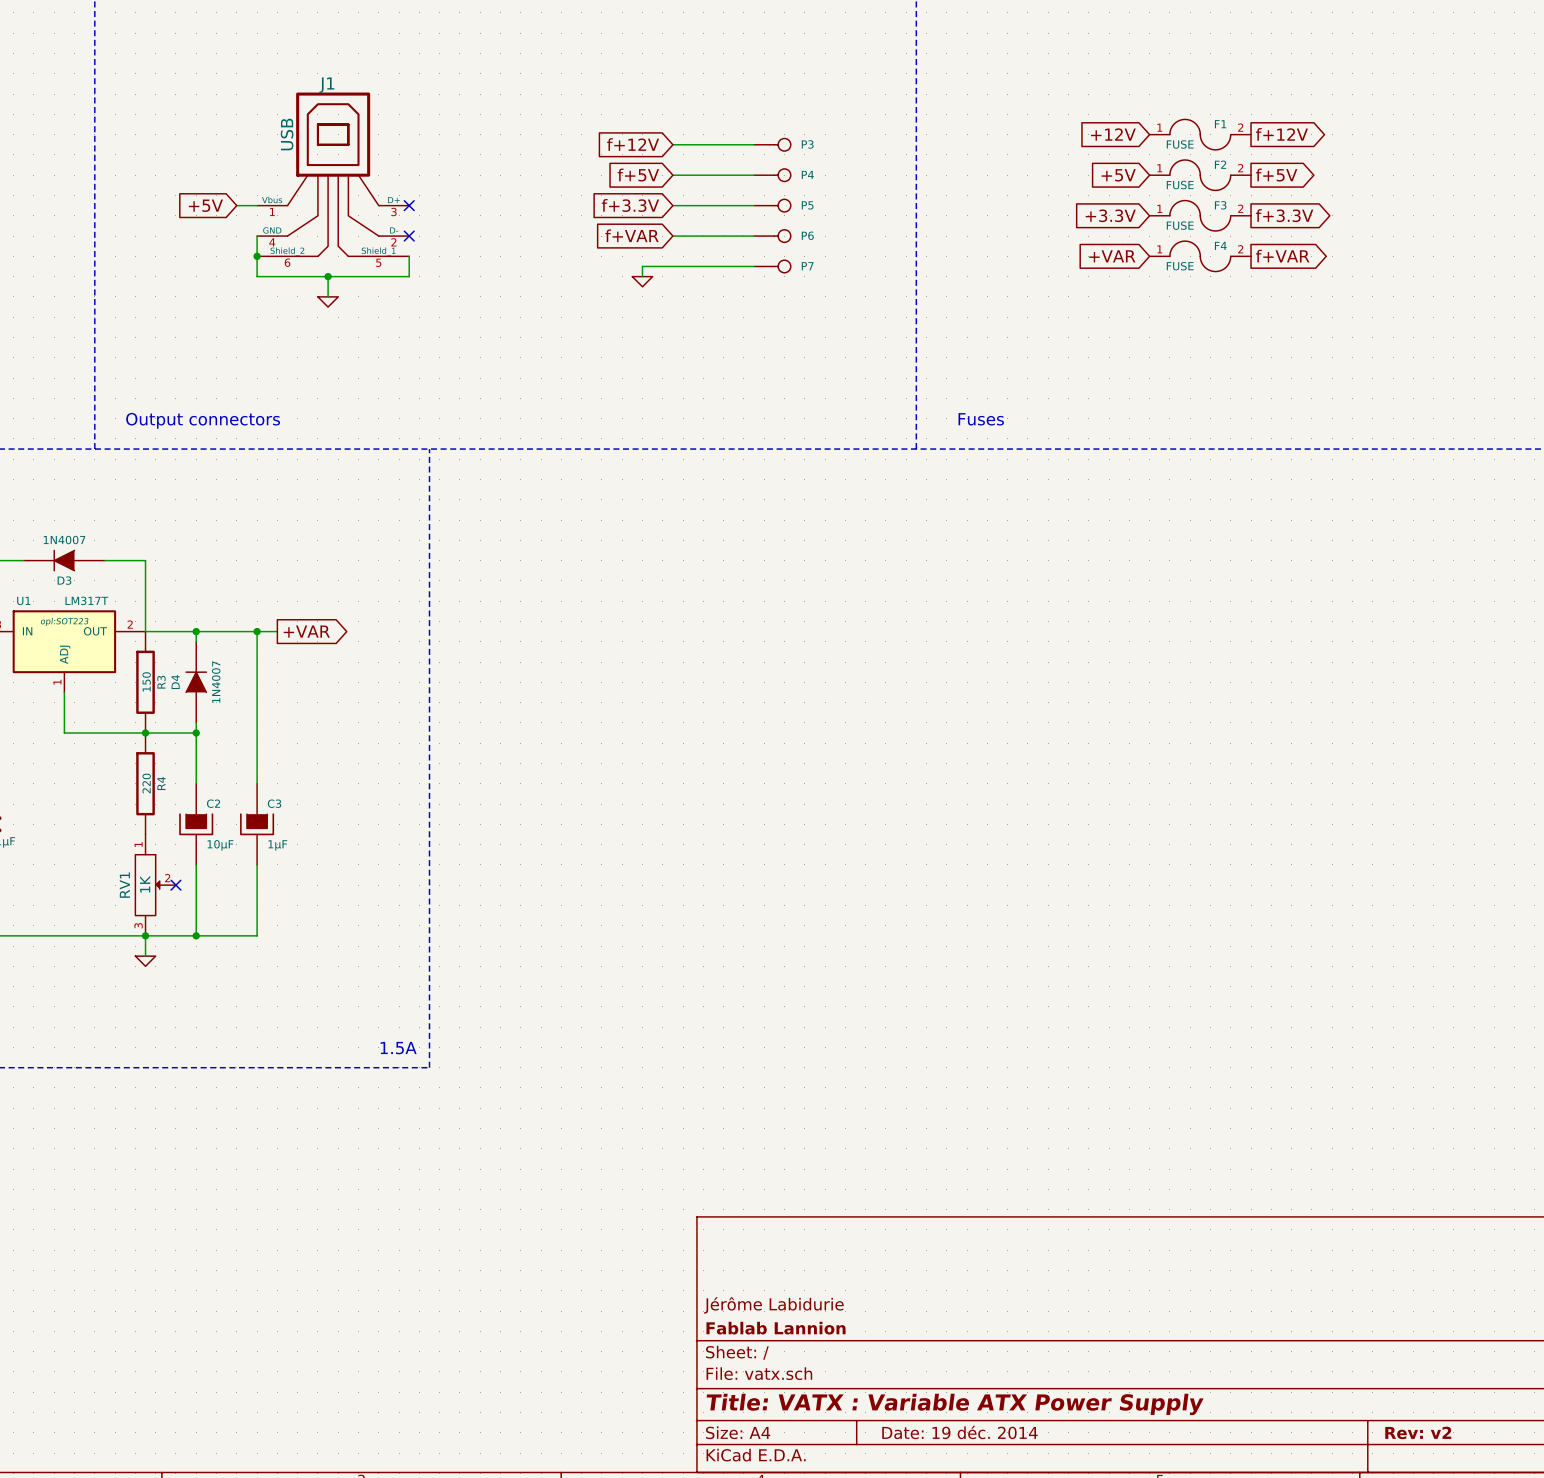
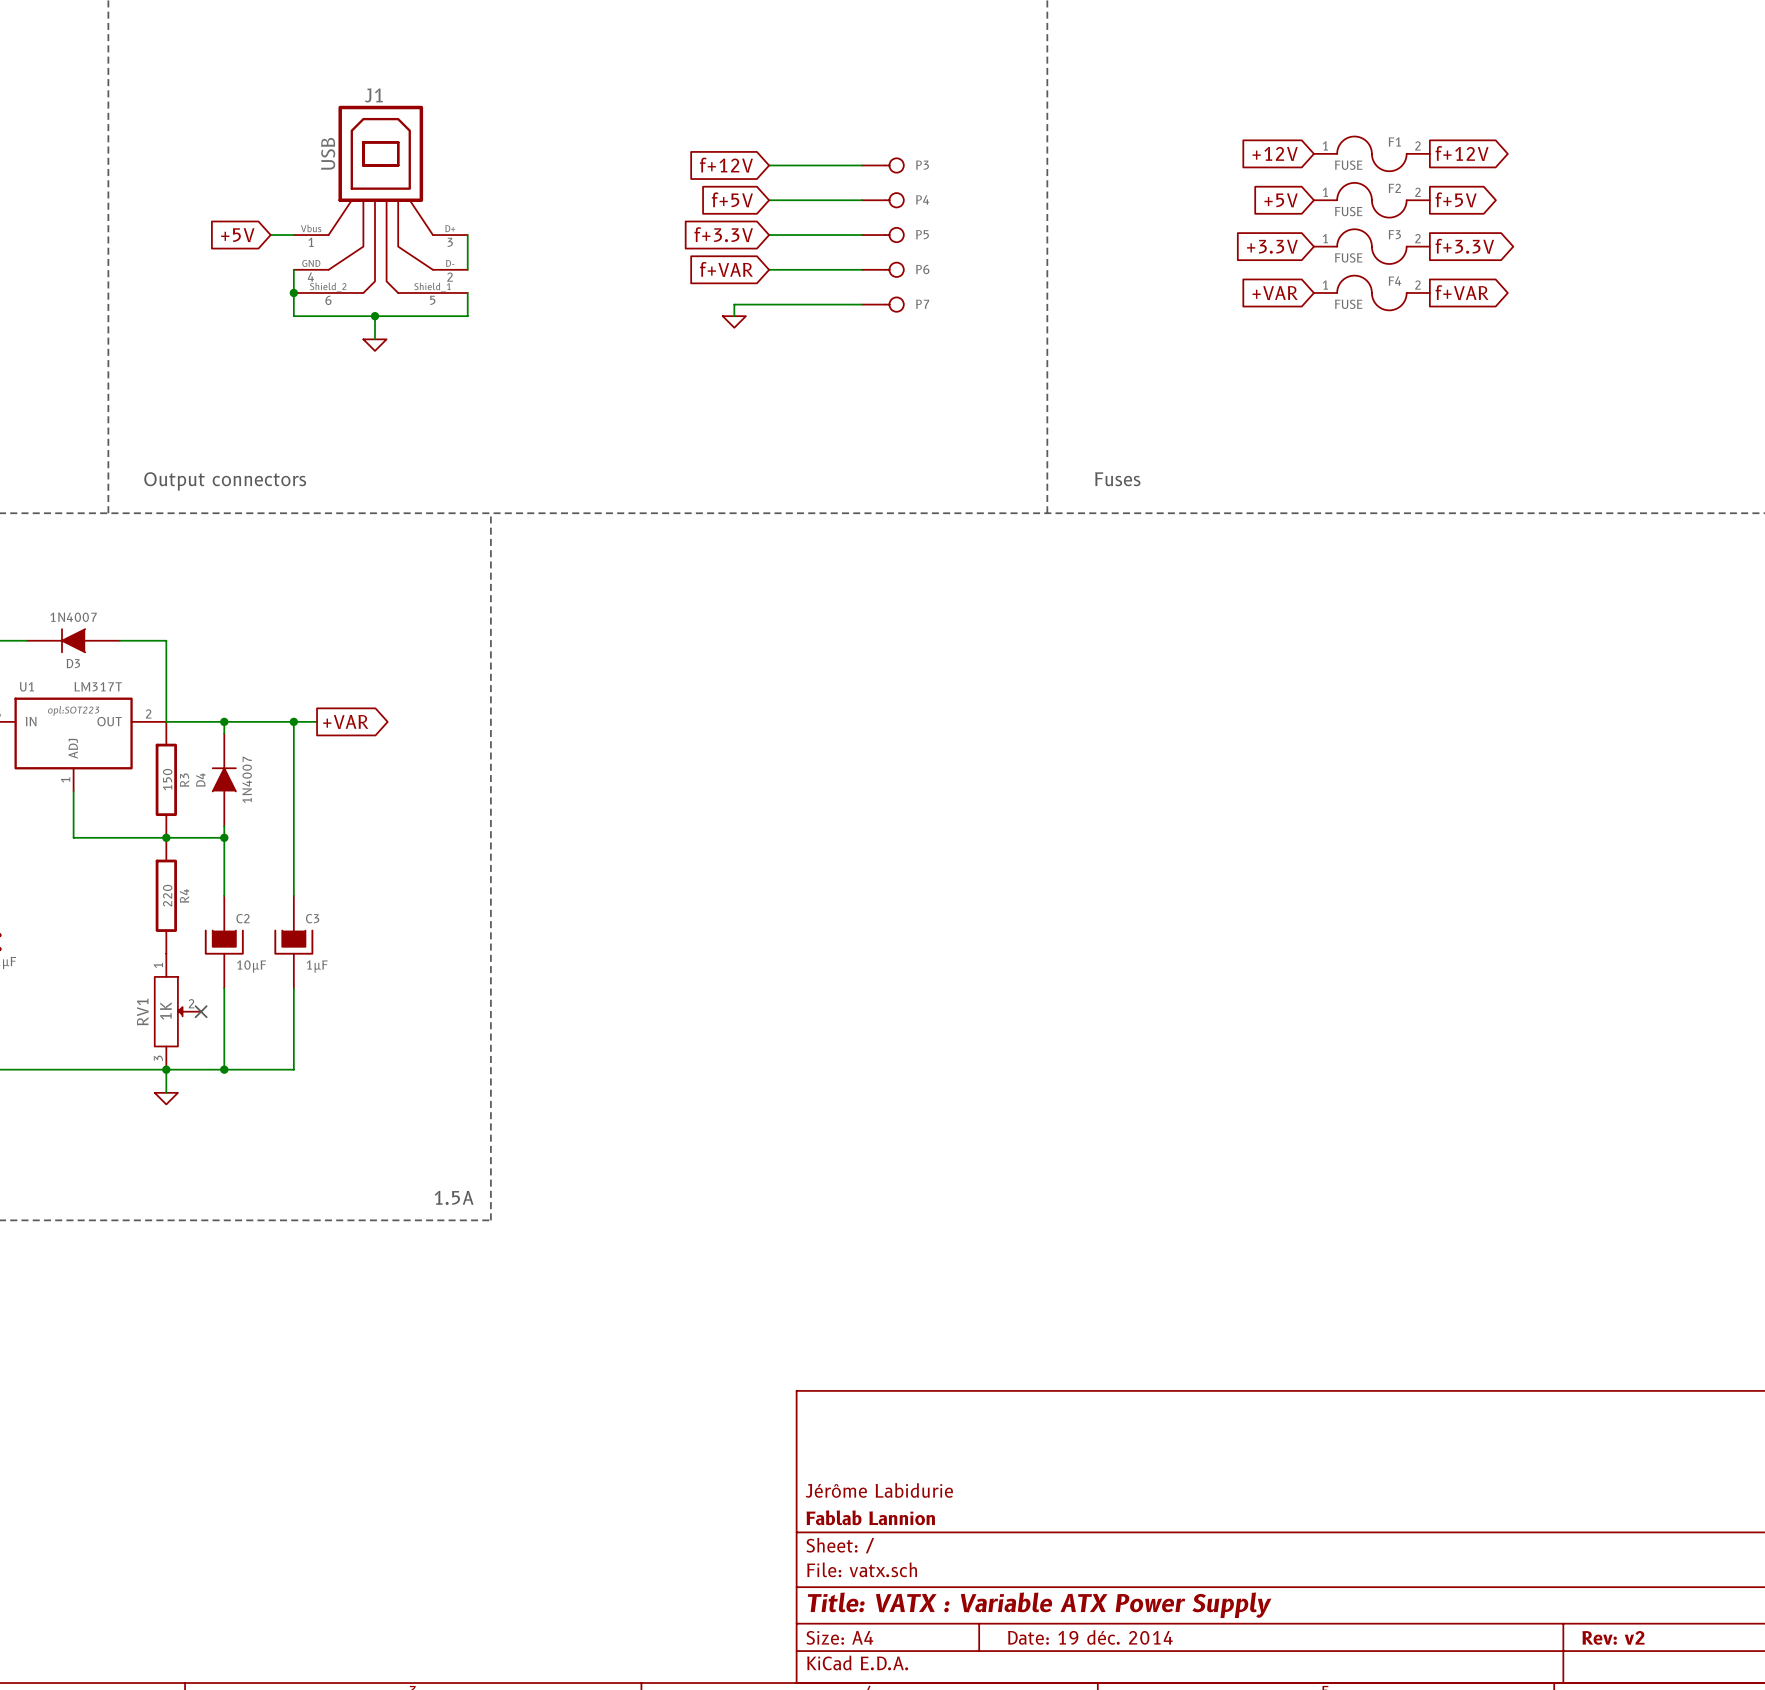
wire: none -> (467, 235) (467, 269)
no-connect mark: (409, 205) -> none
no-connect mark: (409, 236) -> none

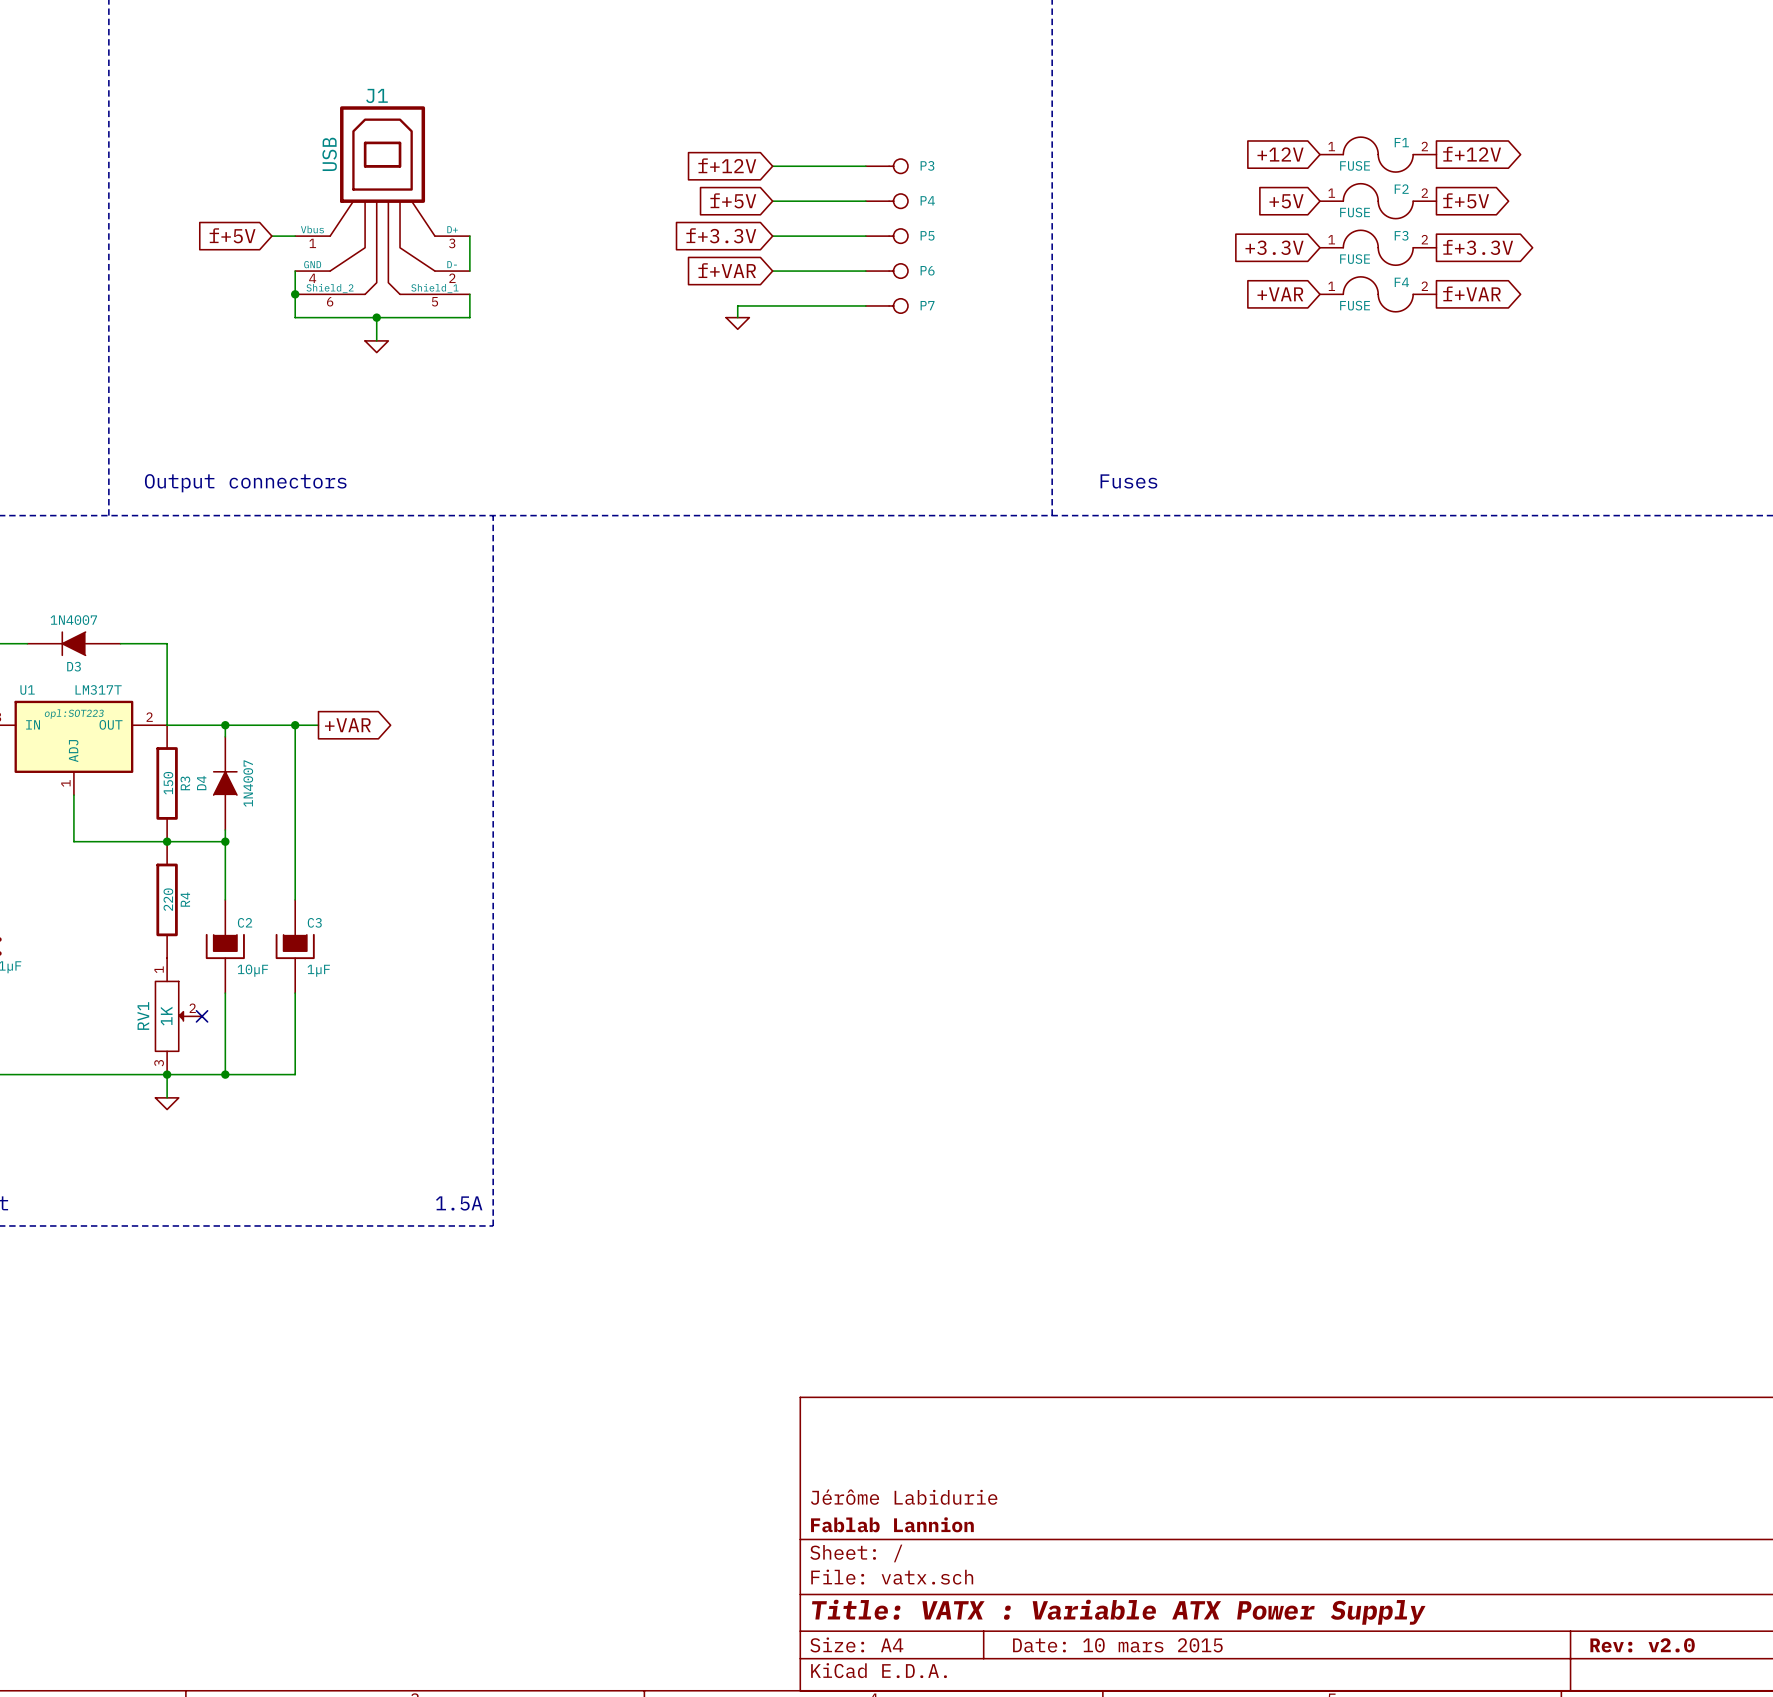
global label: +5V (237, 235) -> f+5V (232, 235)
title block: Date: 19 déc. 2014 (1090, 1637) -> Date: 10 mars 2015 (1117, 1645)
title block: Rev: v2 (1613, 1637) -> Rev: v2.0 (1642, 1645)

